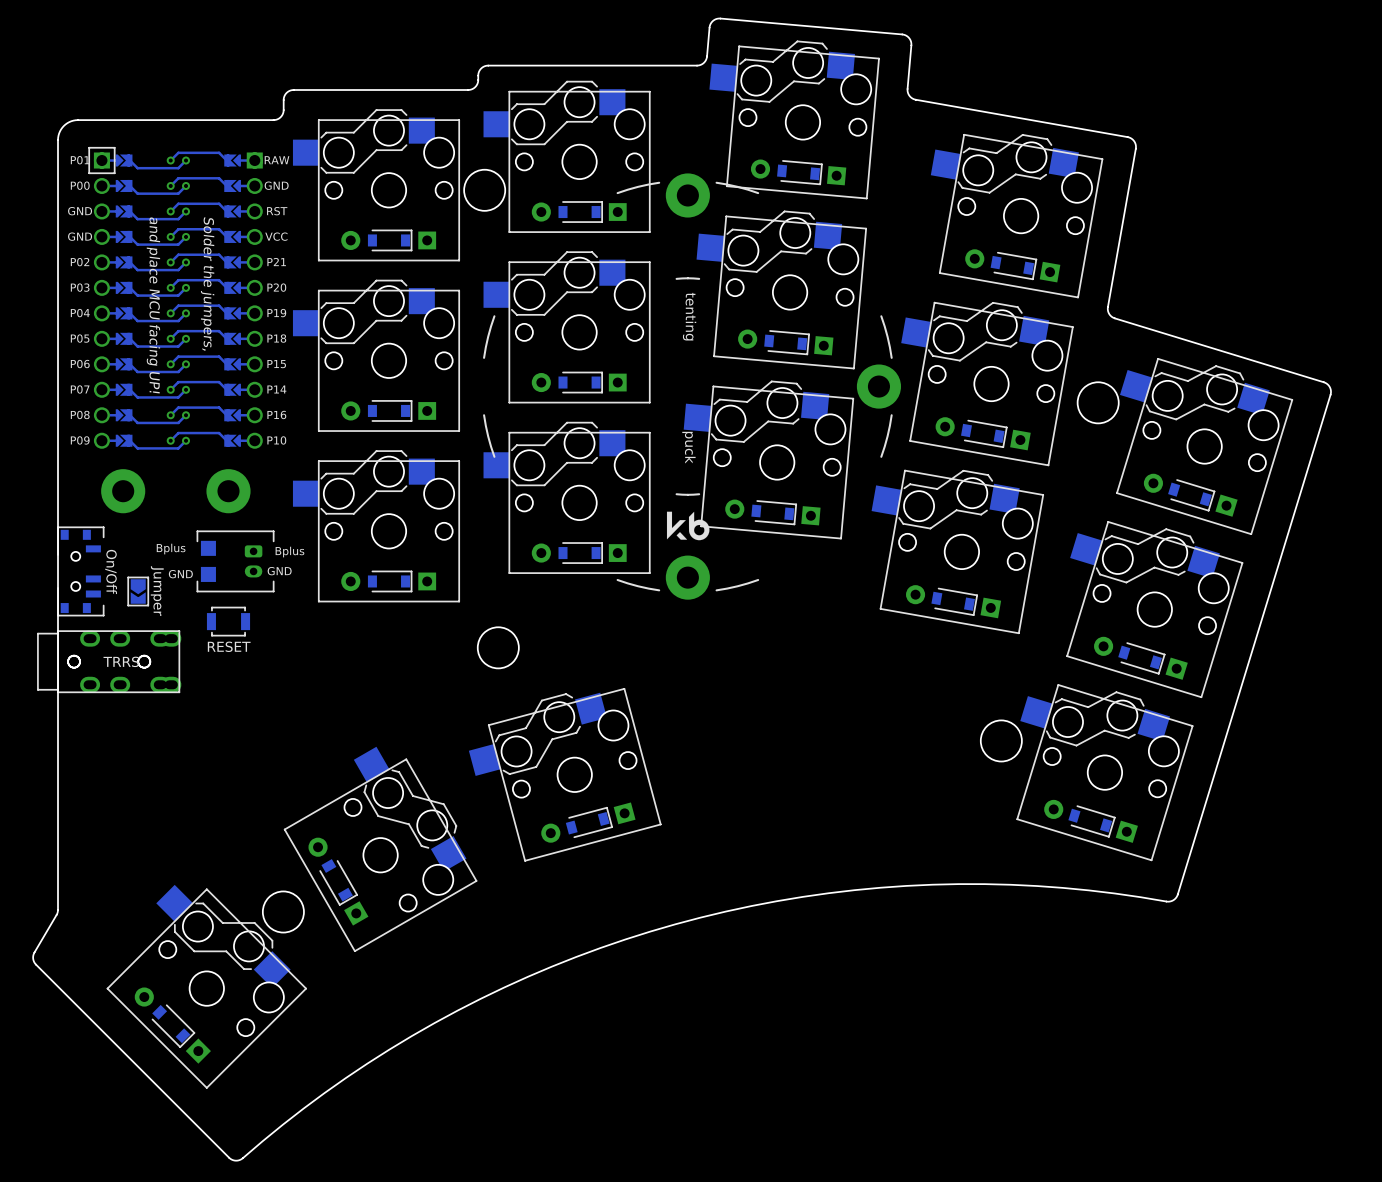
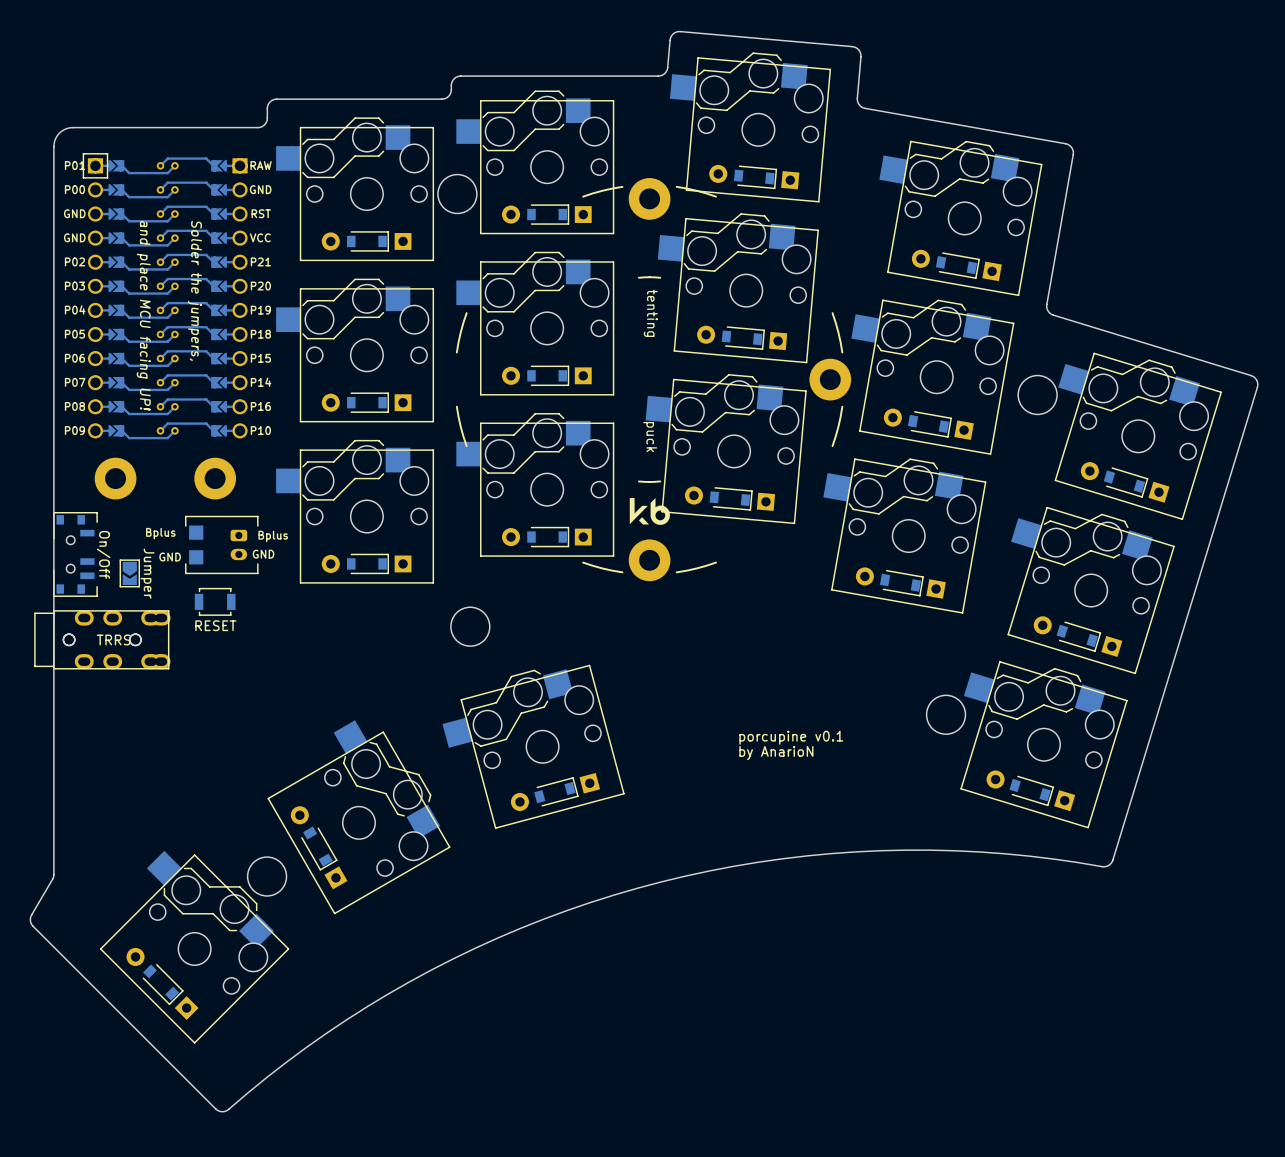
text: none -> porcupine v0.1 (791, 737)
text: none -> by AnarioN (776, 753)

